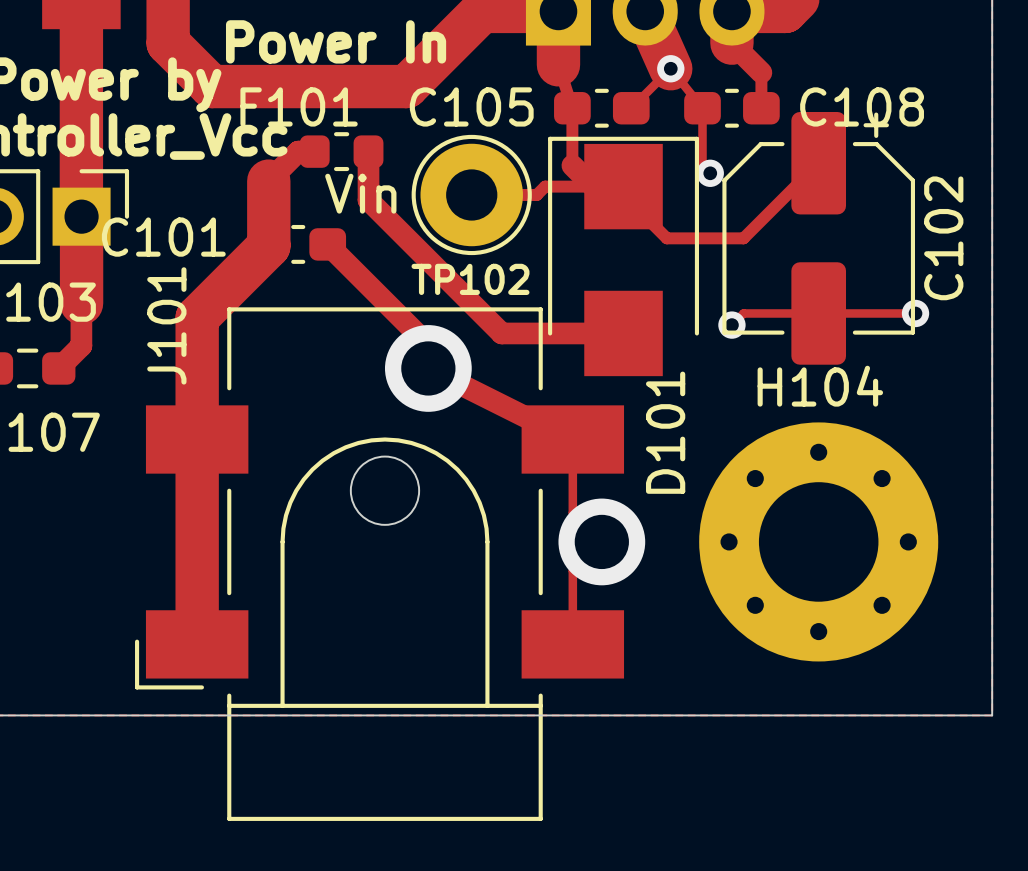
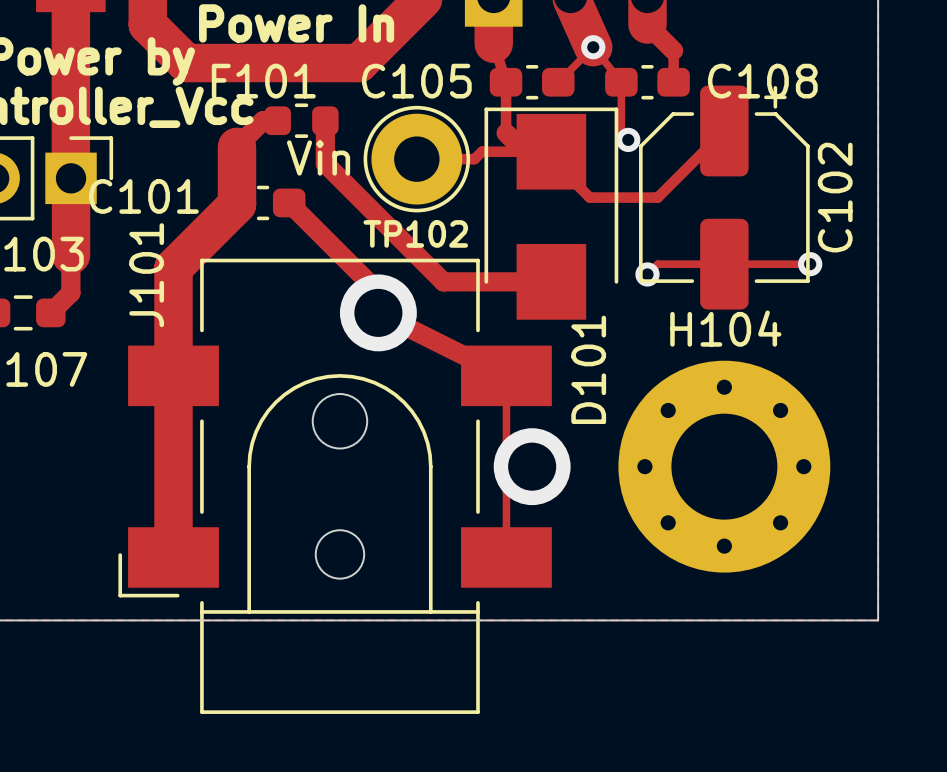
J101 footprint: [135, 307, 625, 821] -> [118, 258, 552, 714]

